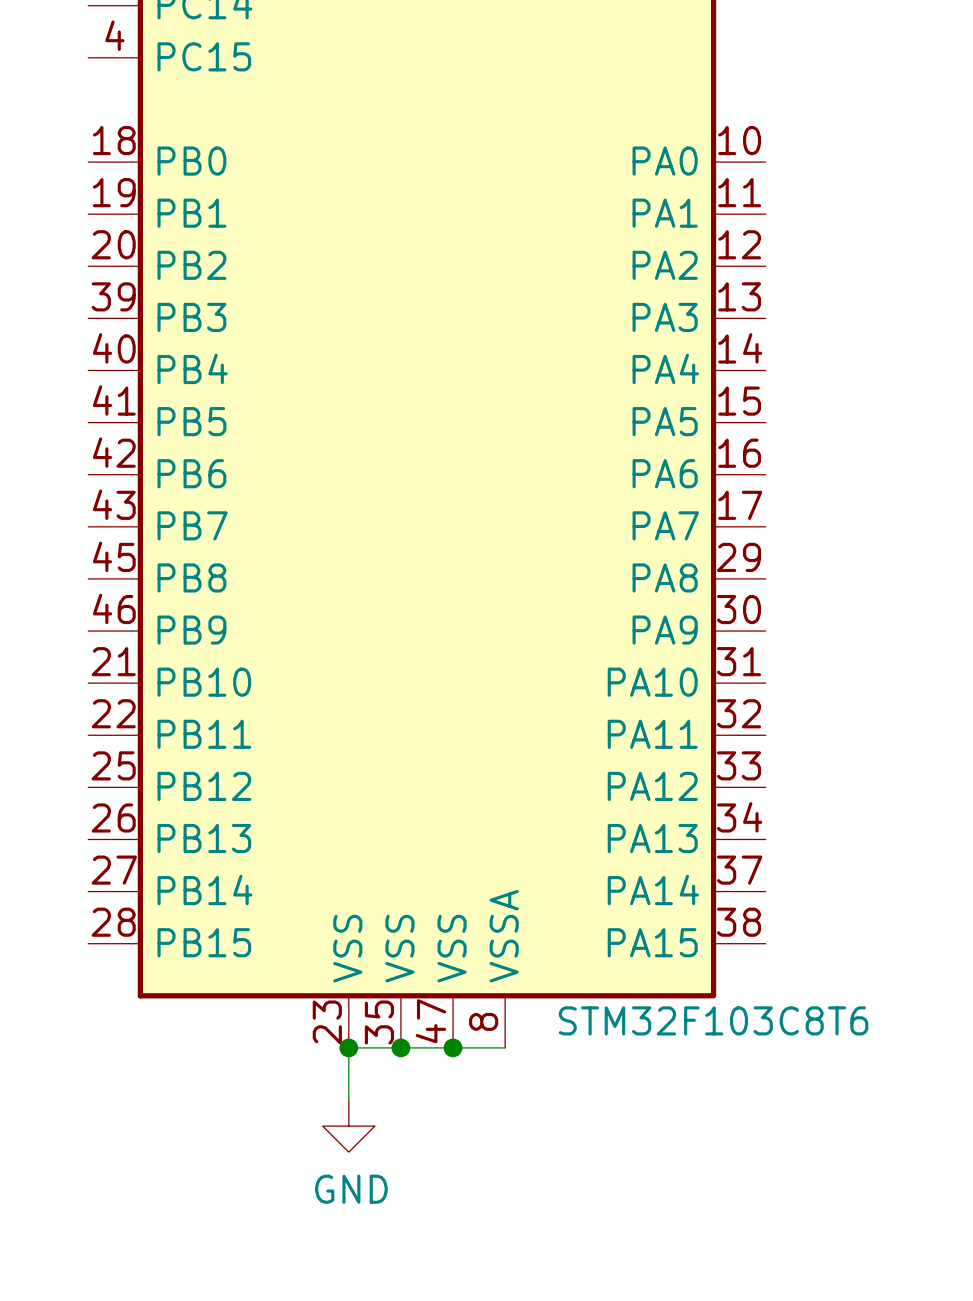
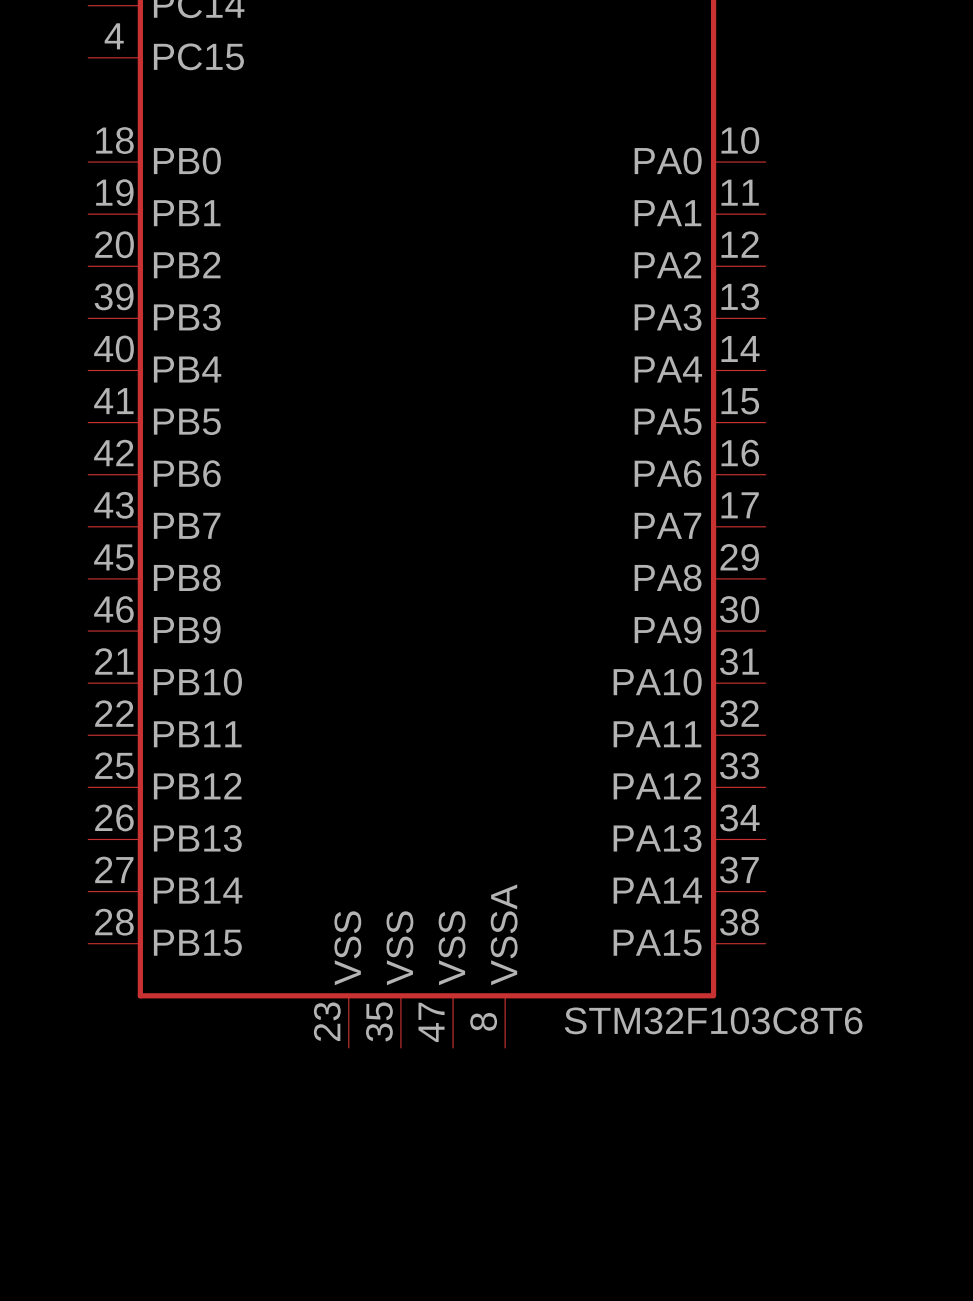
junction: (348, 1047) -> none
junction: (400, 1047) -> none
junction: (453, 1047) -> none
wire: (505, 1047) (348, 1047) (348, 1100) -> none
power symbol: GND (348, 1126) -> none

